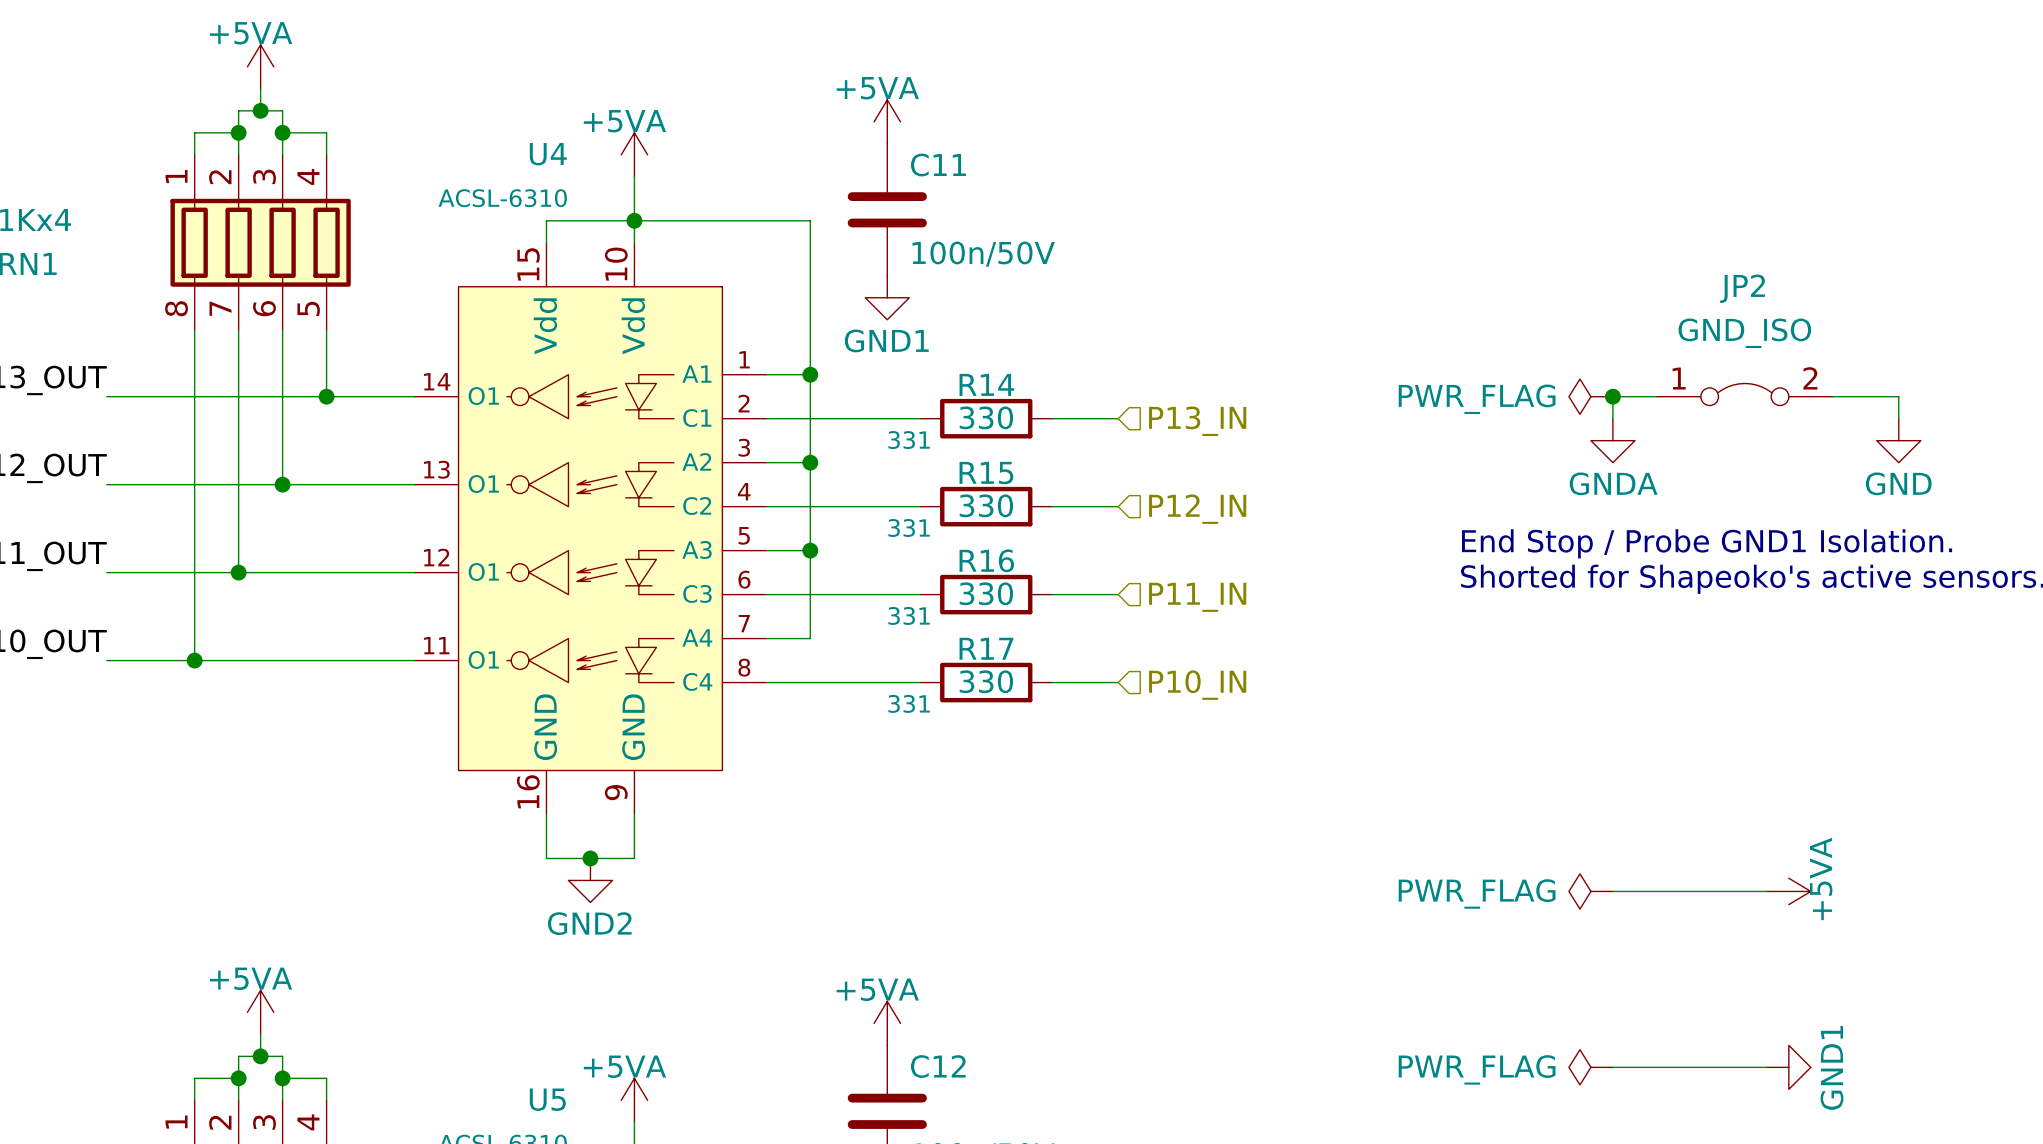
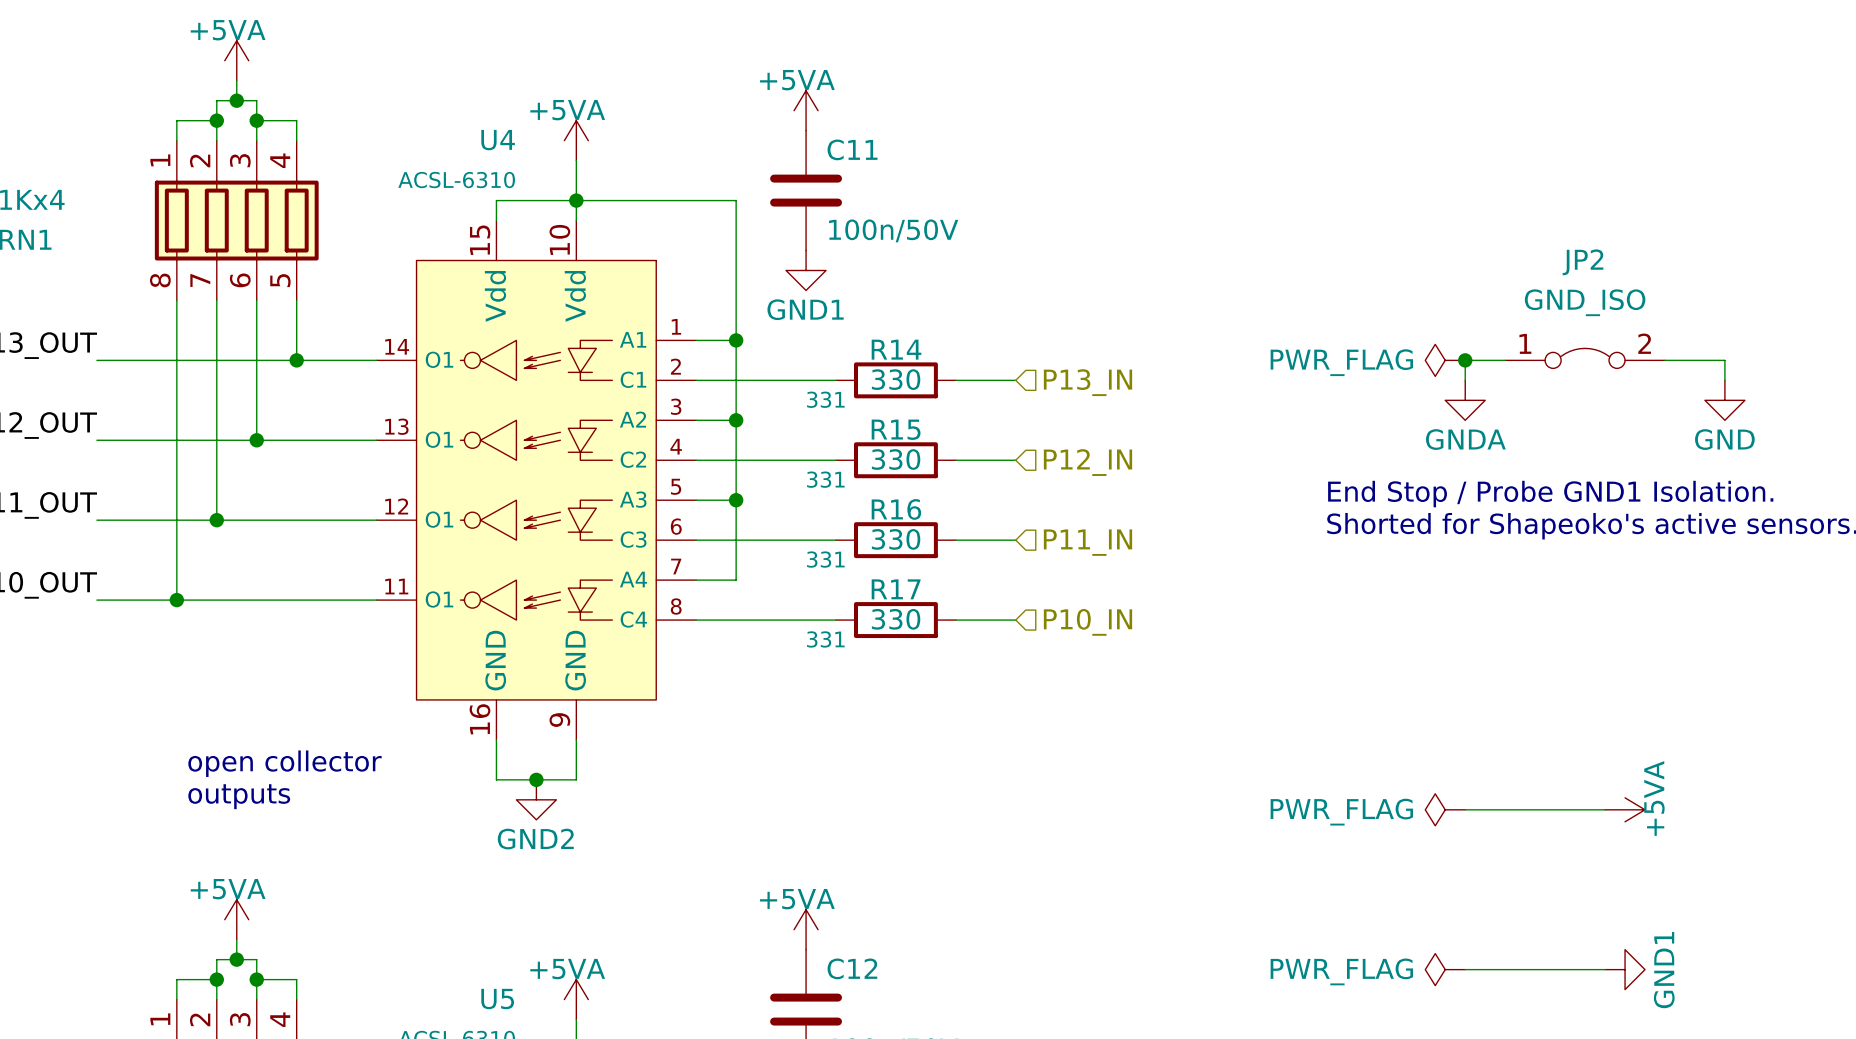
text: none -> open collector (284, 763)
text: none -> outputs (239, 796)

